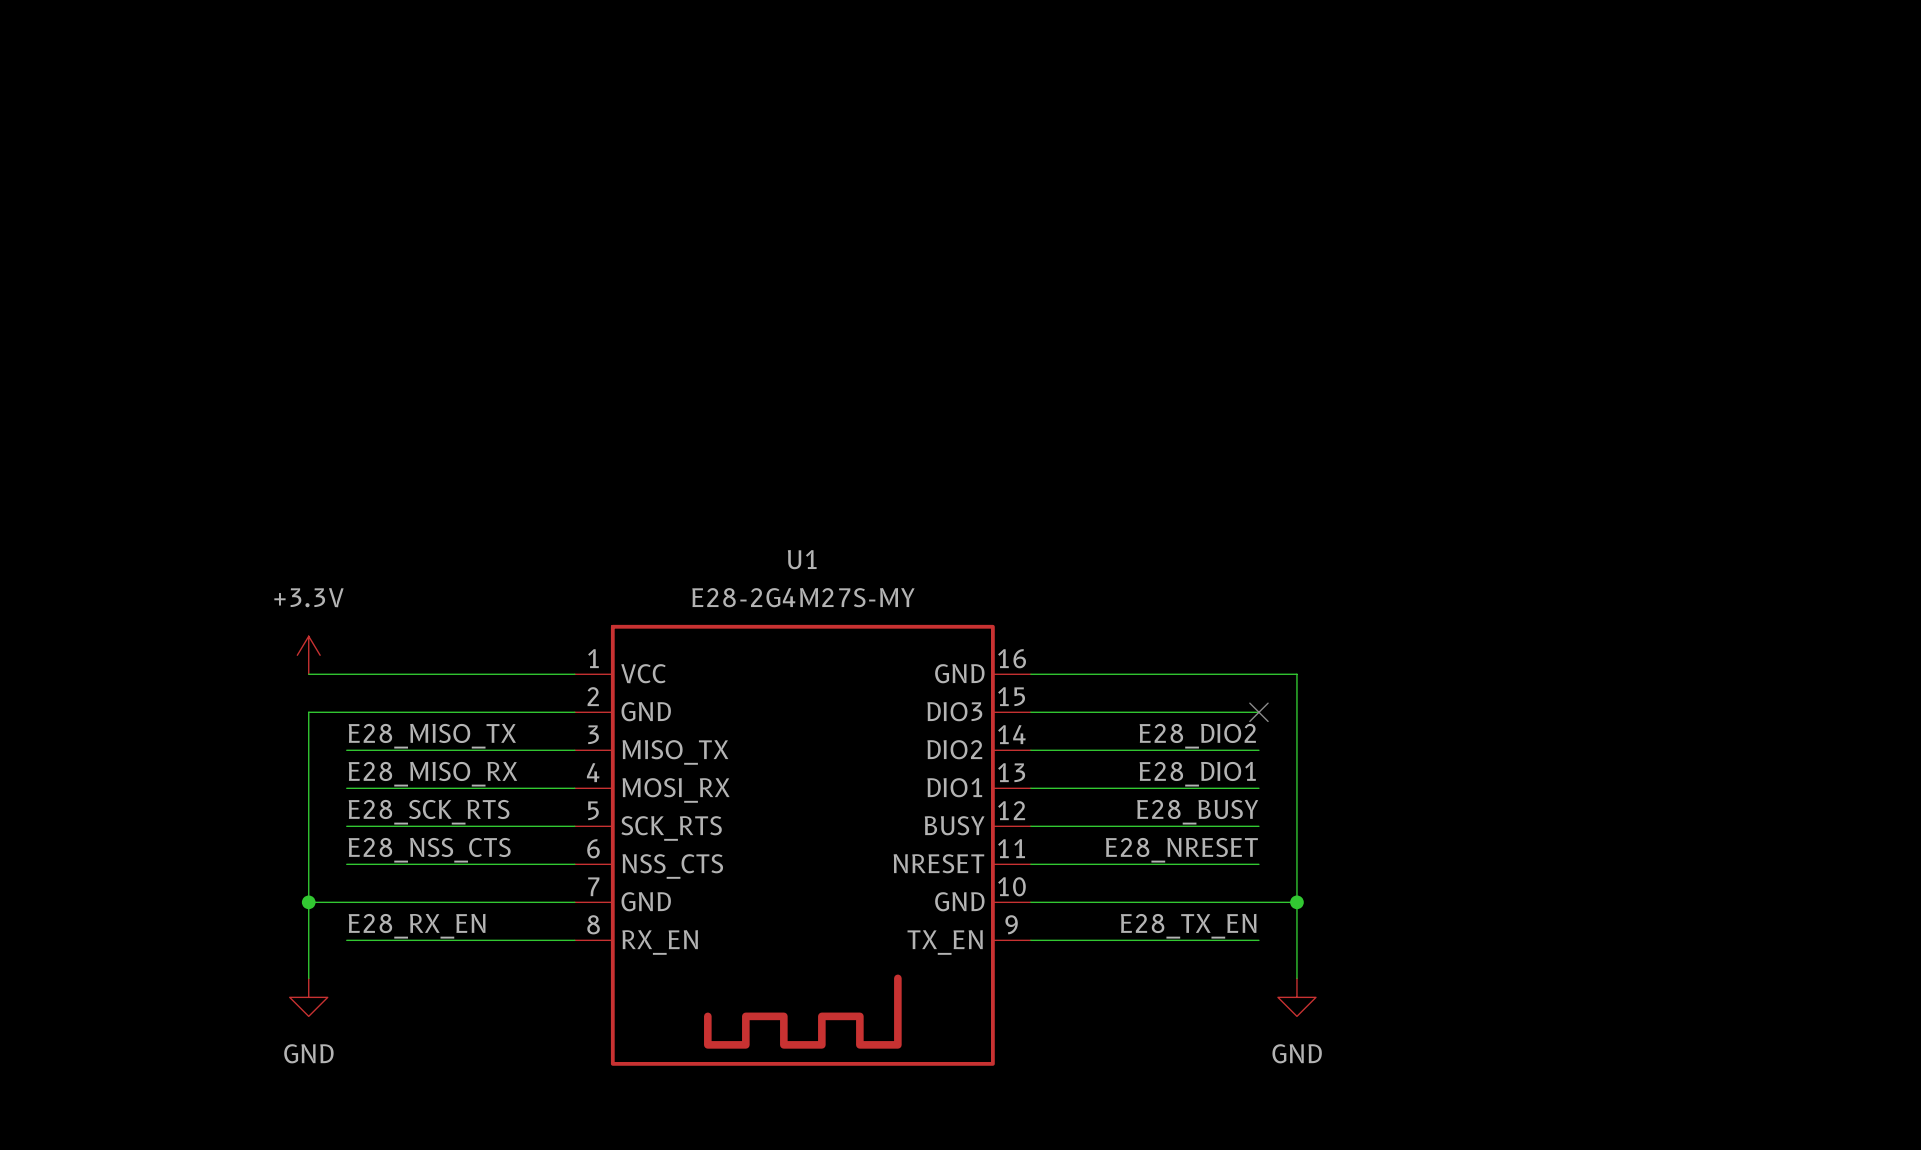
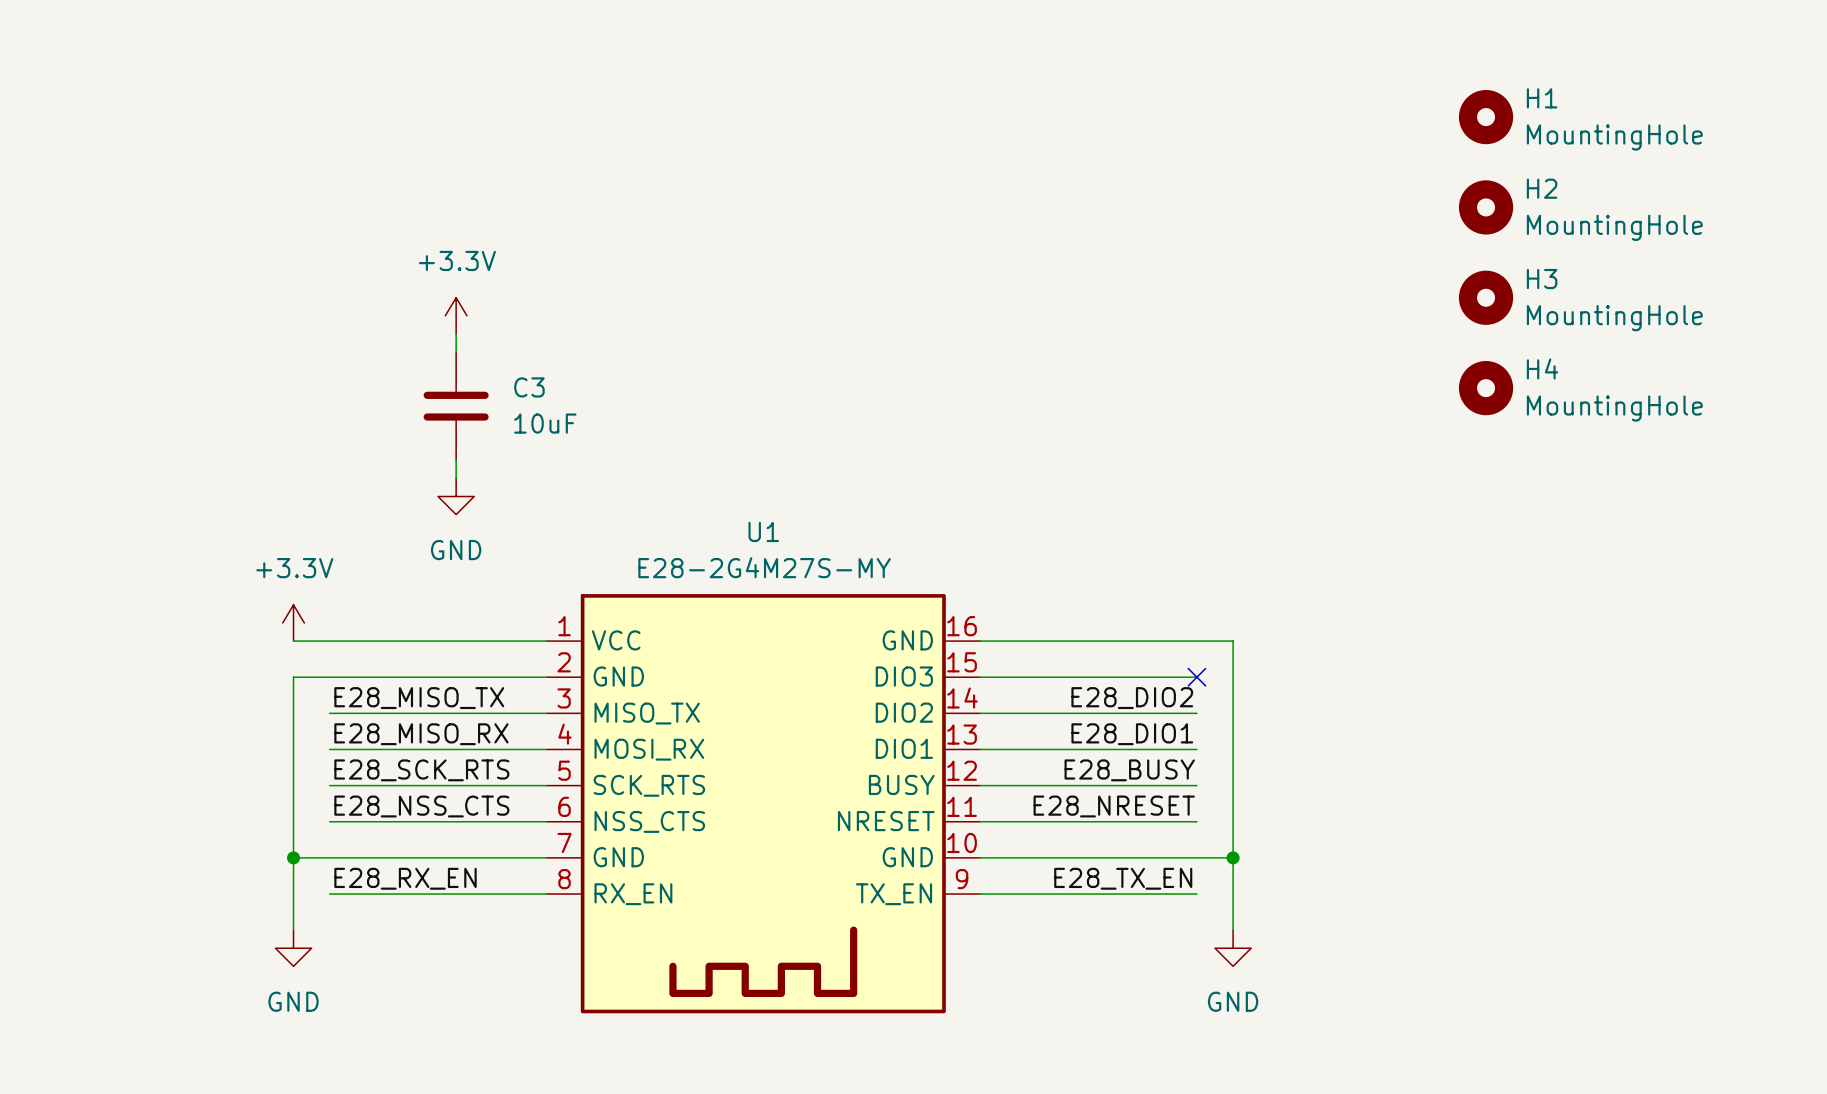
H1: none -> MountingHole (1486, 117)
H2: none -> MountingHole (1486, 207)
H3: none -> MountingHole (1486, 297)
power symbol: none -> +3.3V (456, 315)
wire: none -> (456, 333) (456, 351)
H4: none -> MountingHole (1486, 388)
C3: none -> 10uF (456, 406)
wire: none -> (456, 460) (456, 478)
power symbol: none -> GND (456, 496)

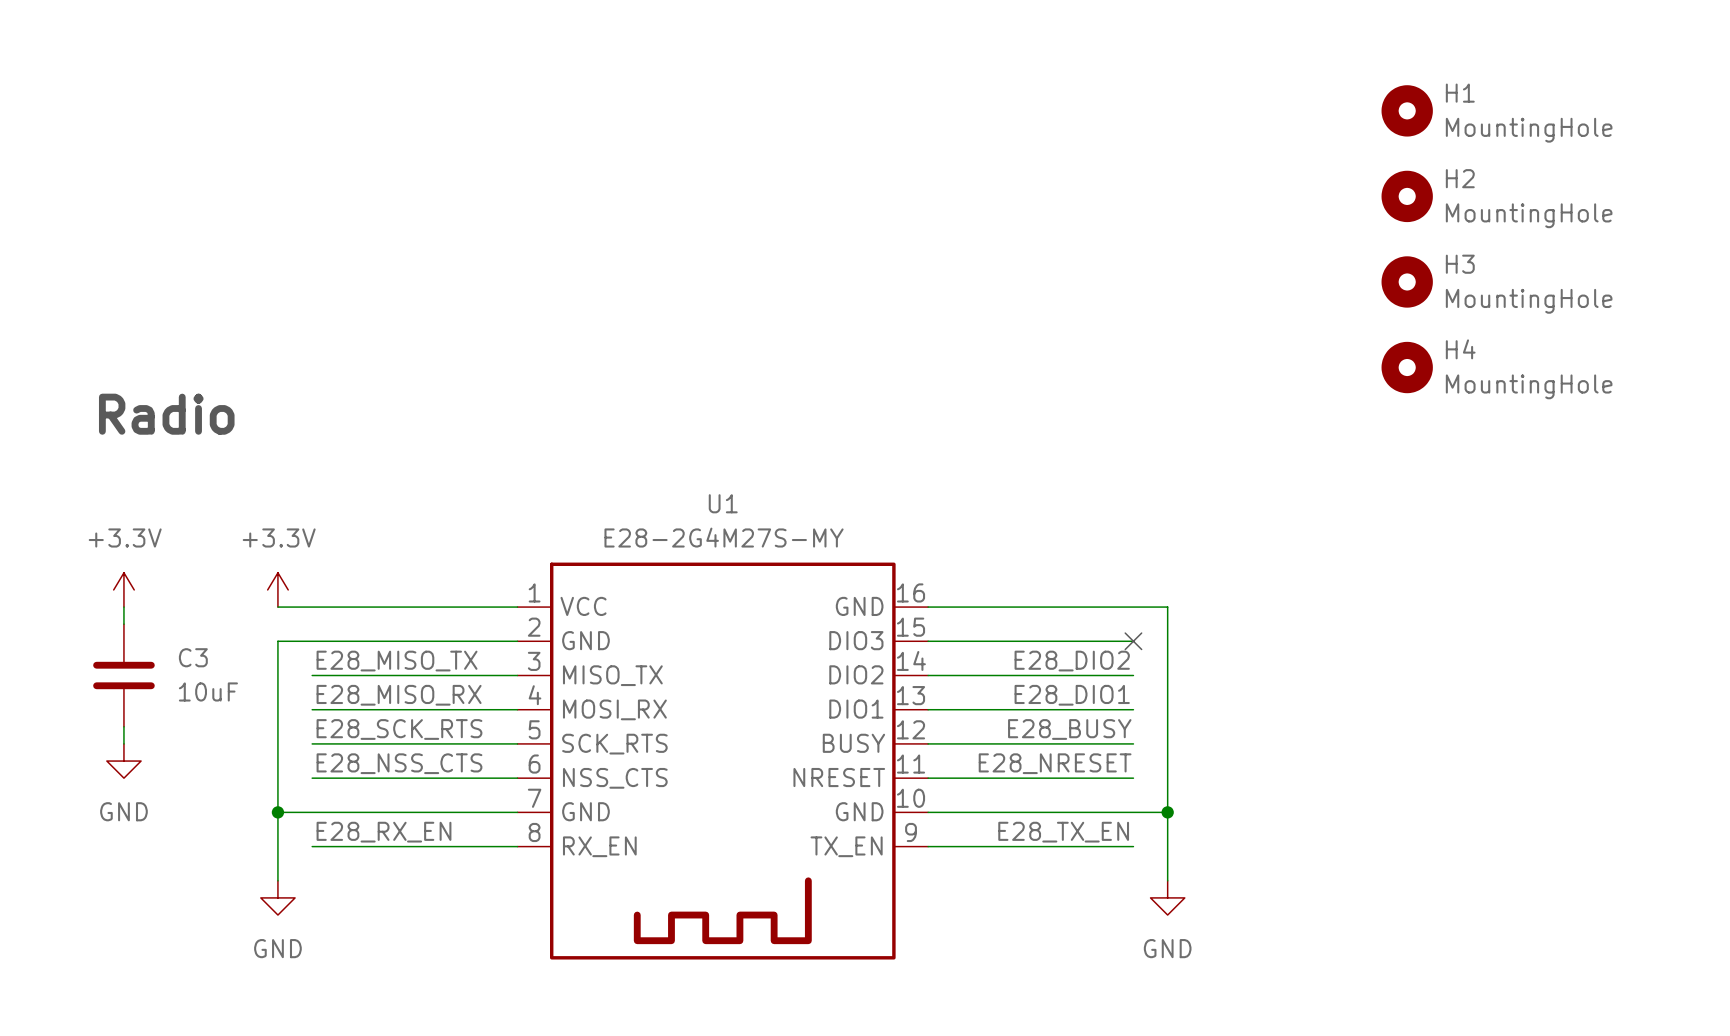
power symbol: +3.3V (456, 315) -> none
wire: (456, 333) (456, 351) -> none
C3 position: (456, 406) -> (123, 675)
text: none -> Radio (166, 414)
wire: (456, 460) (456, 478) -> none
power symbol: GND (456, 496) -> none
power symbol: none -> +3.3V (123, 589)
wire: none -> (123, 607) (123, 624)
wire: none -> (123, 726) (123, 743)
power symbol: none -> GND (123, 761)

